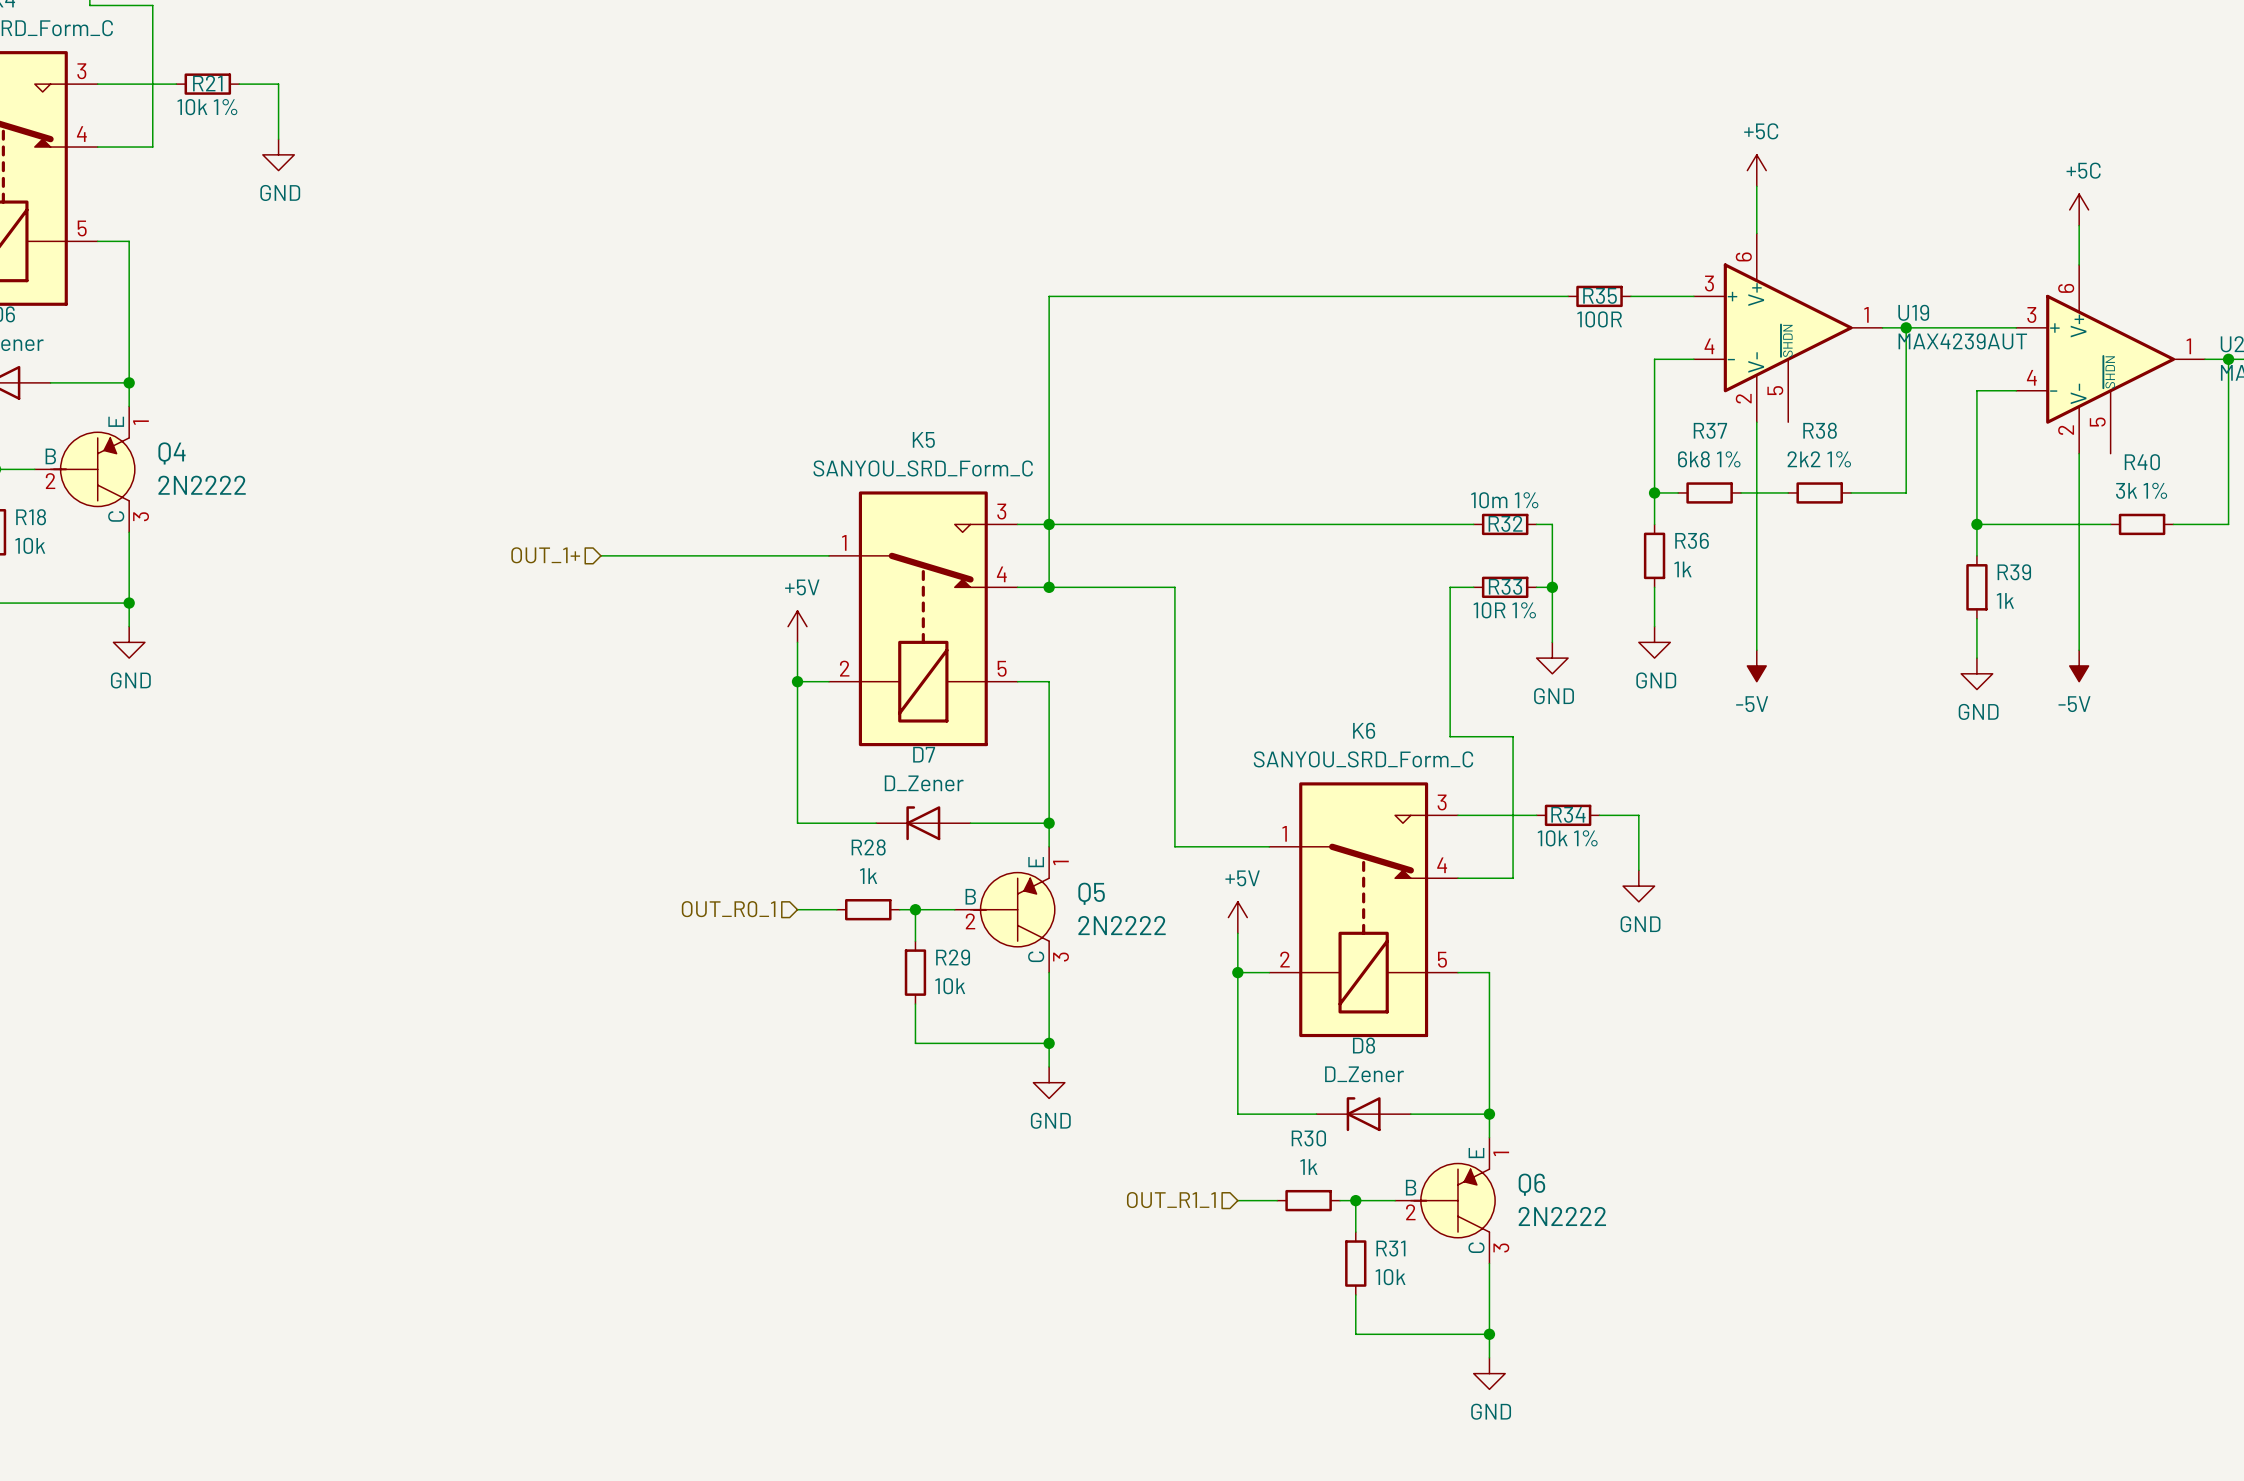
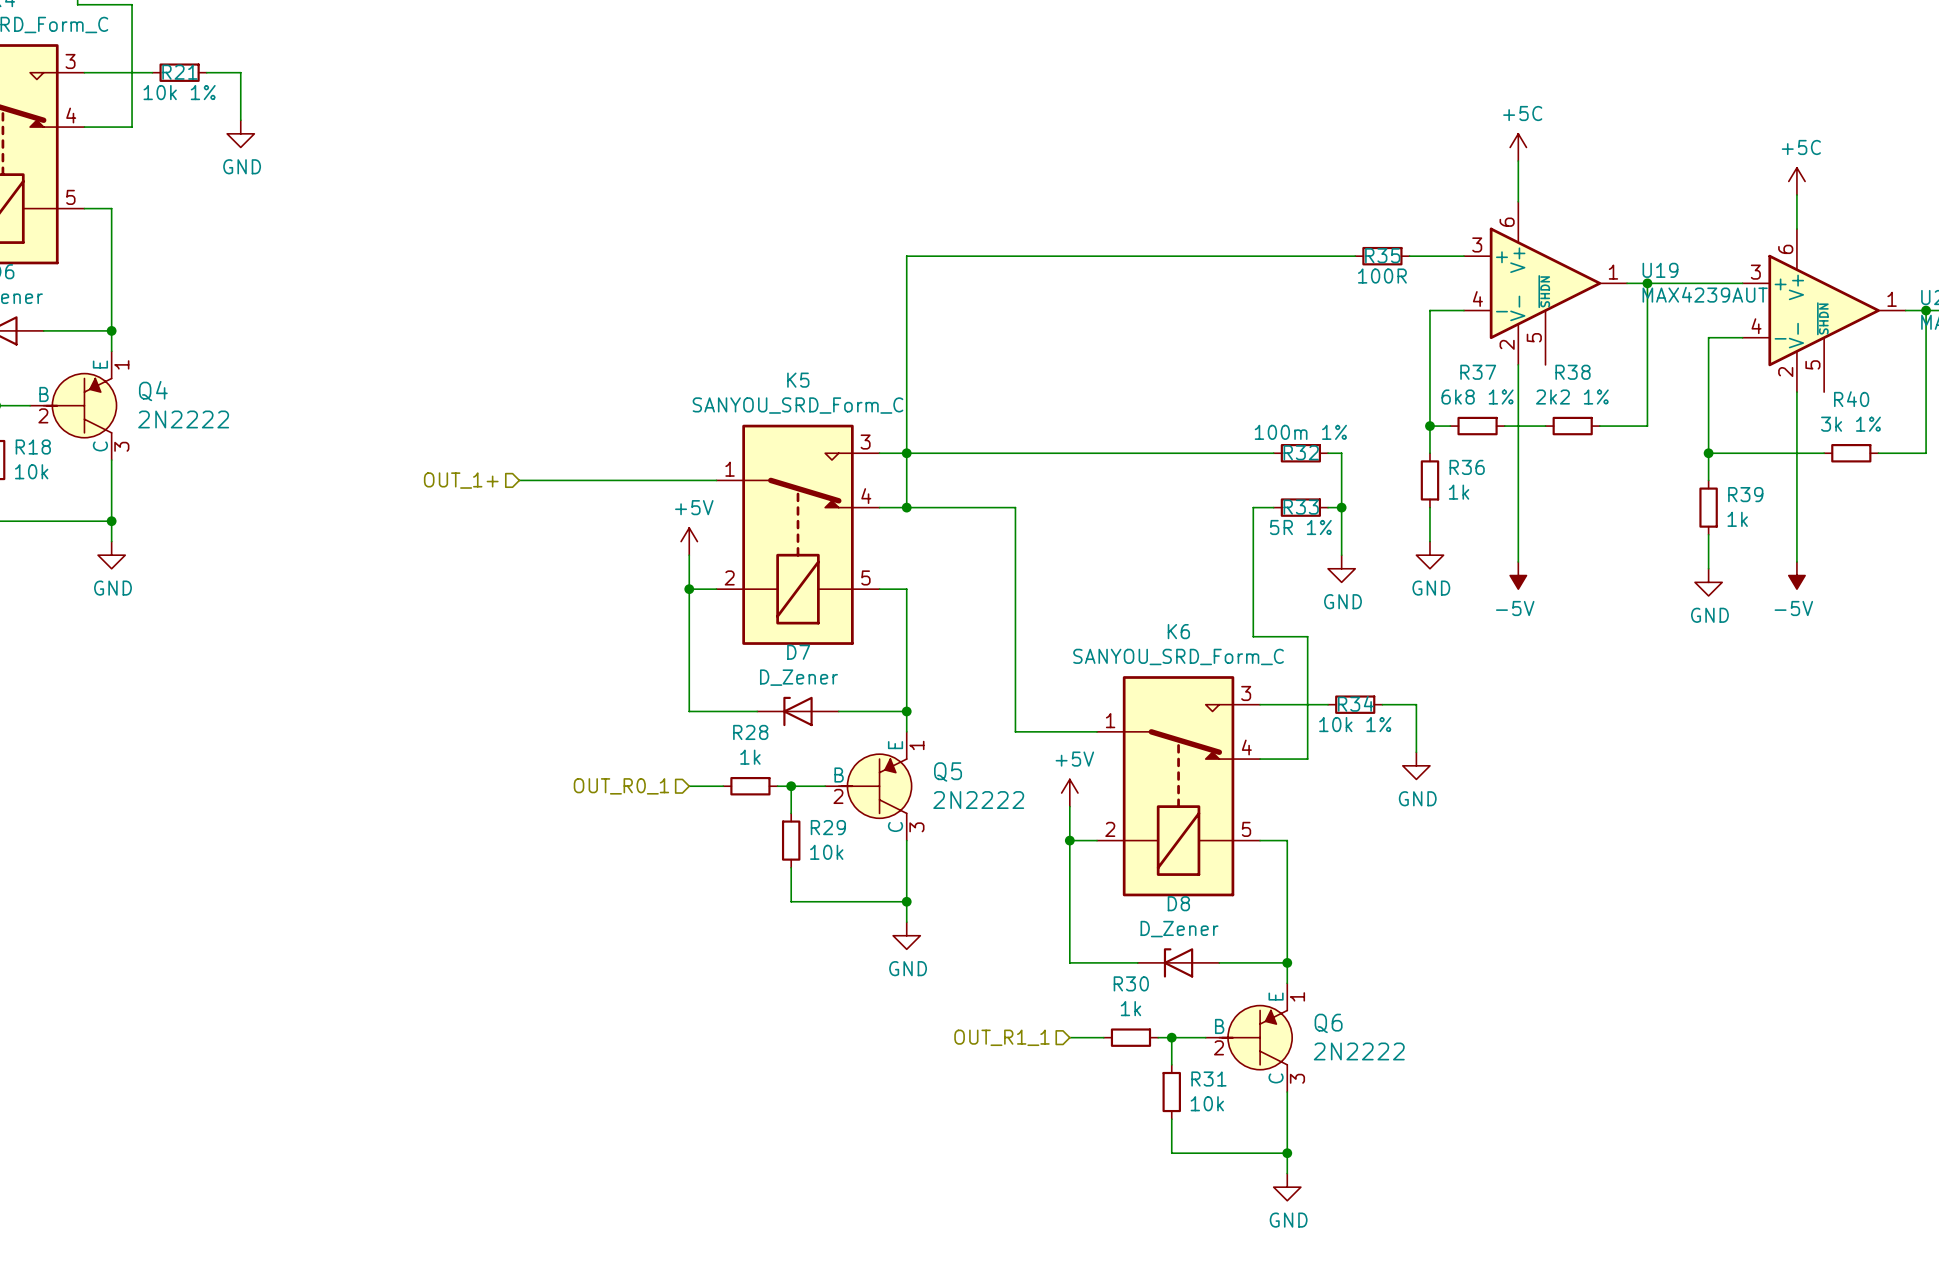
R32 value: 10m 1% (1504, 500) -> 100m 1% (1300, 432)
R33 value: 10R 1% (1504, 610) -> 5R 1% (1300, 527)

